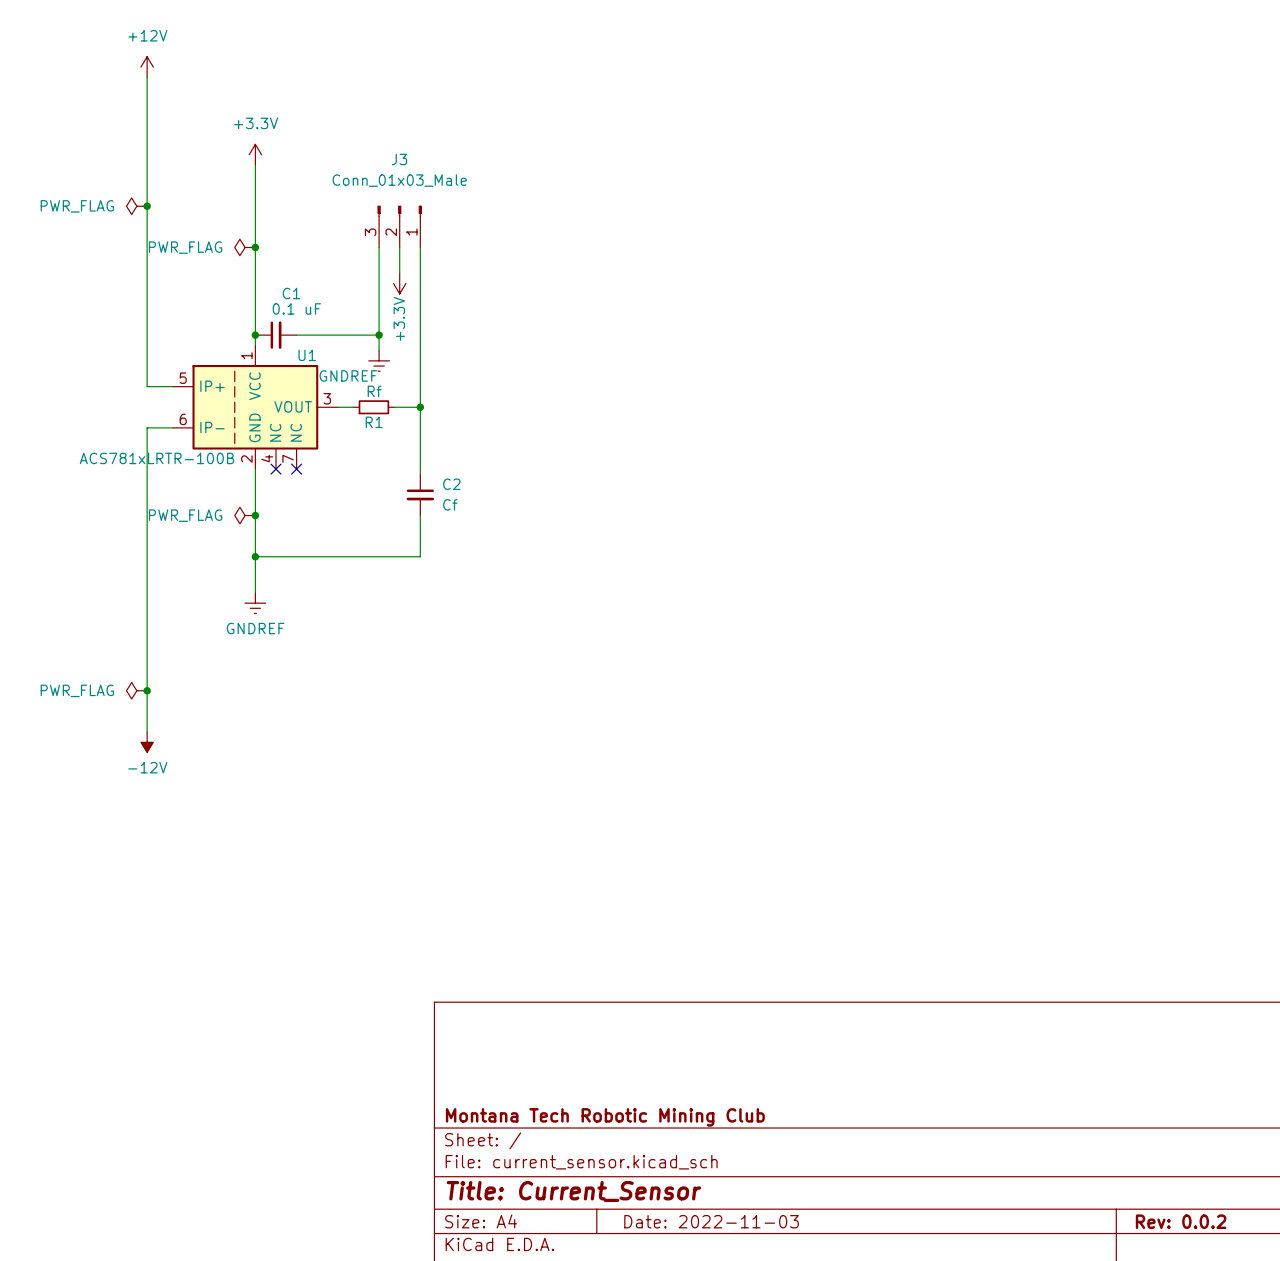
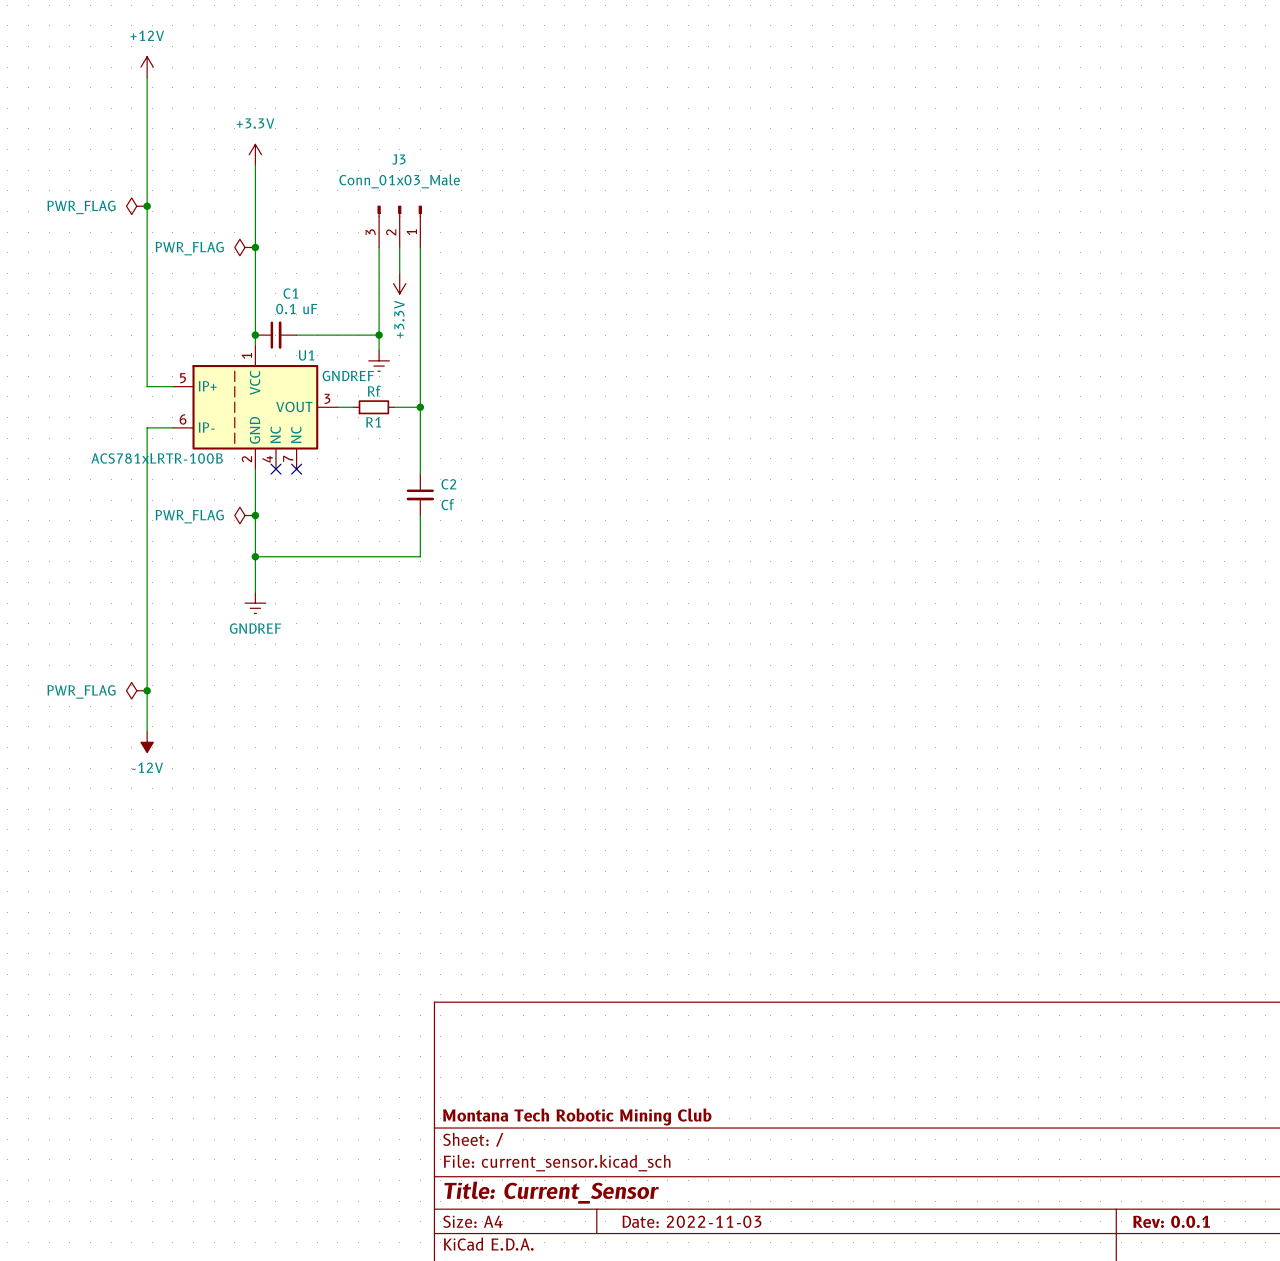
title block: Rev: 0.0.2 (1181, 1221) -> Rev: 0.0.1 (1171, 1221)

